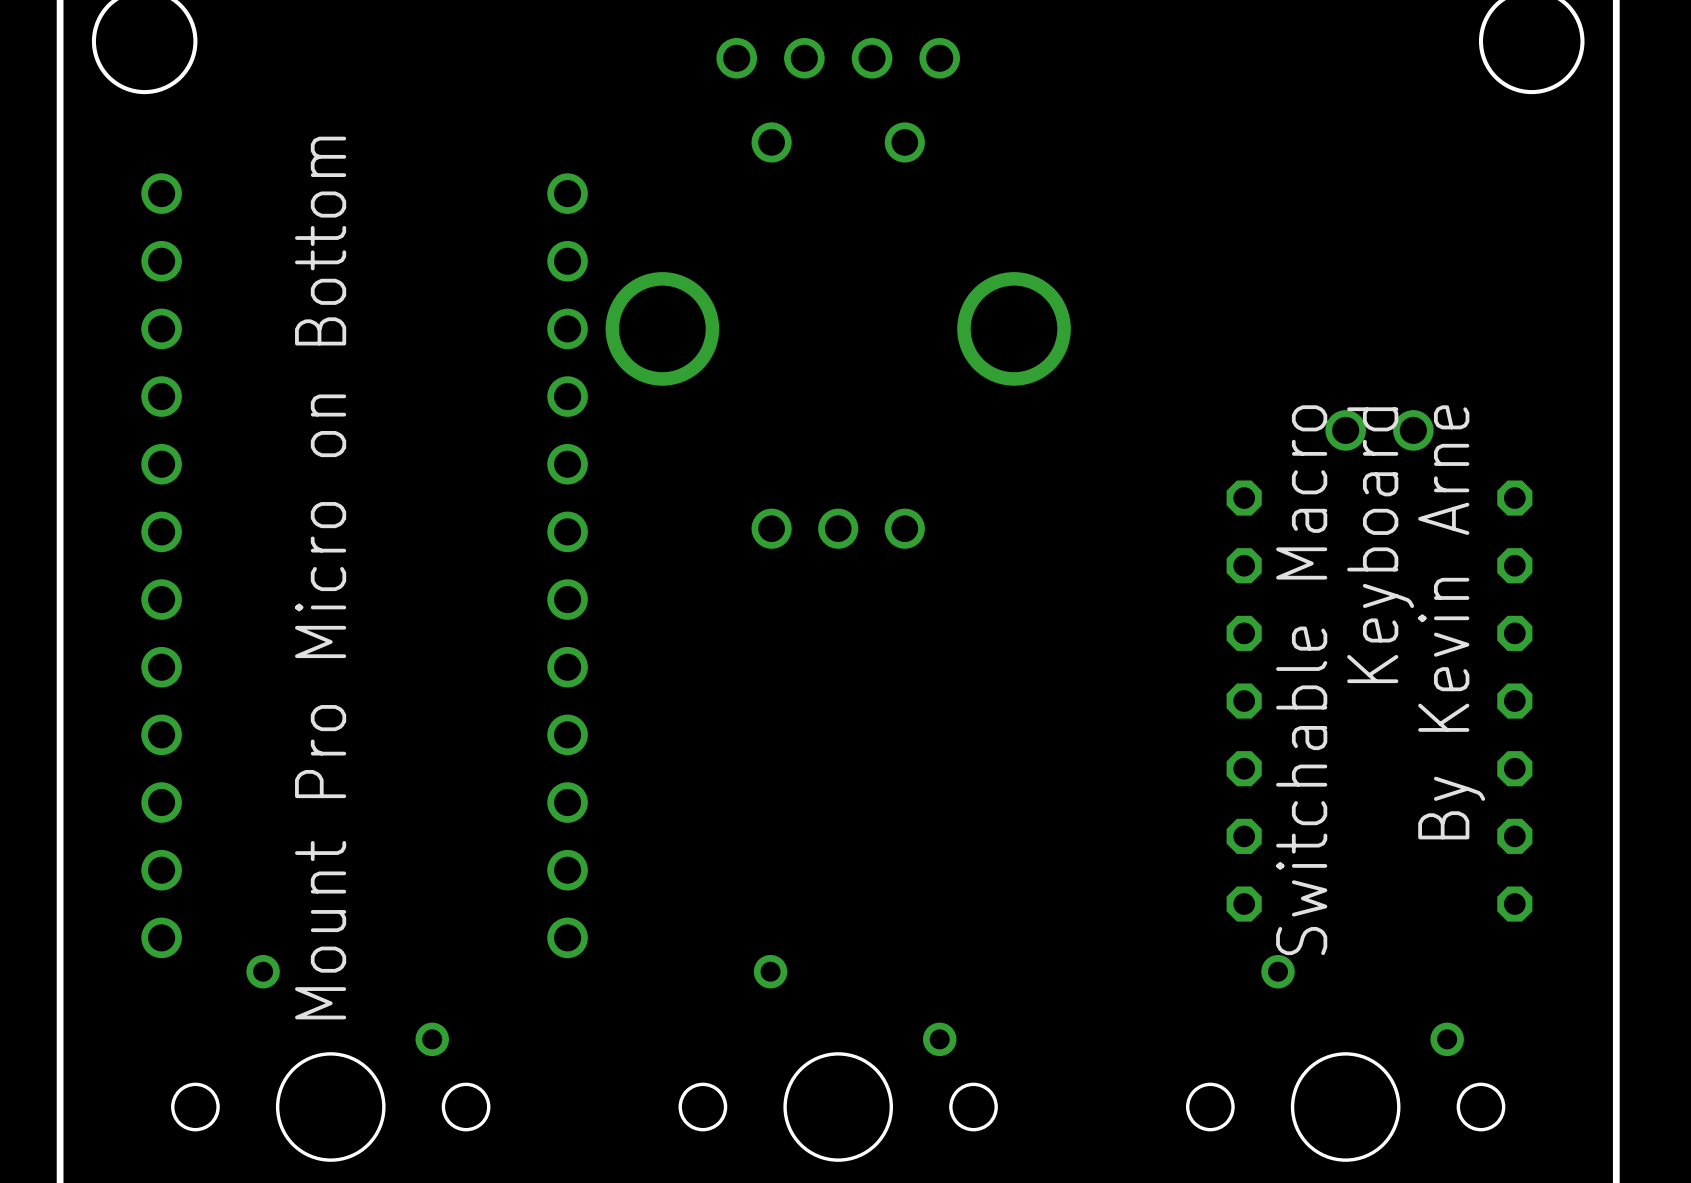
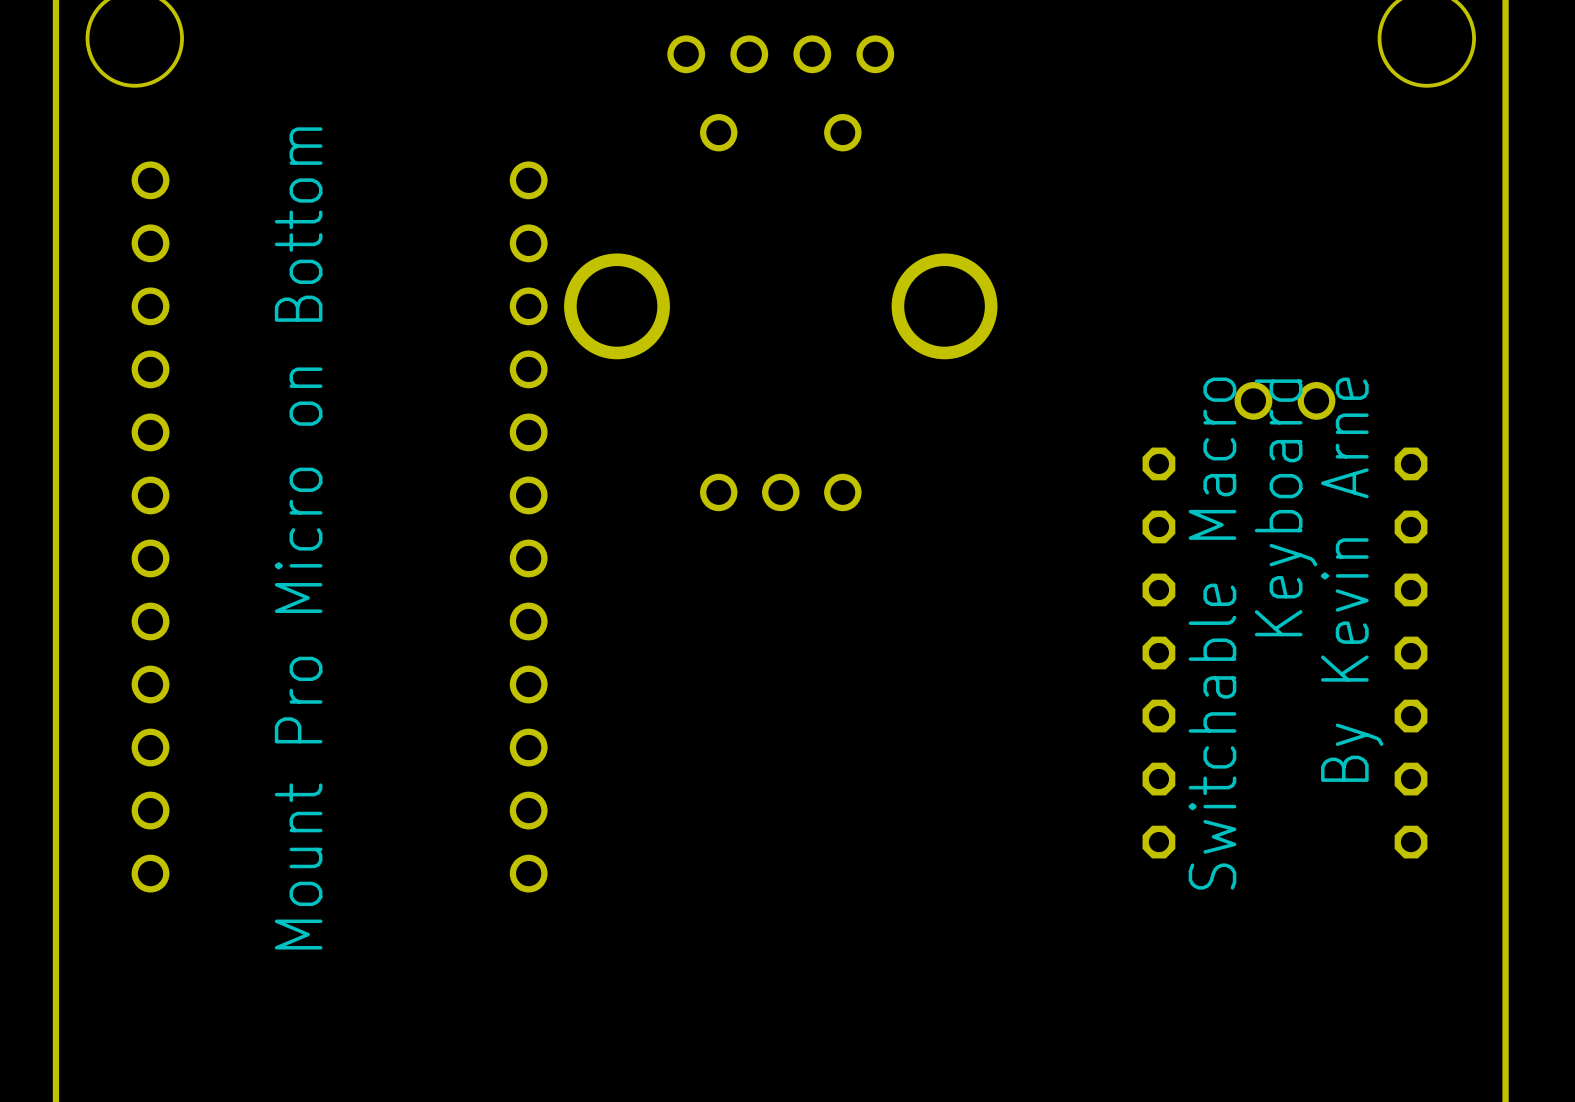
part: (330, 1058) -> none
part: (838, 1058) -> none
part: (1345, 1058) -> none

